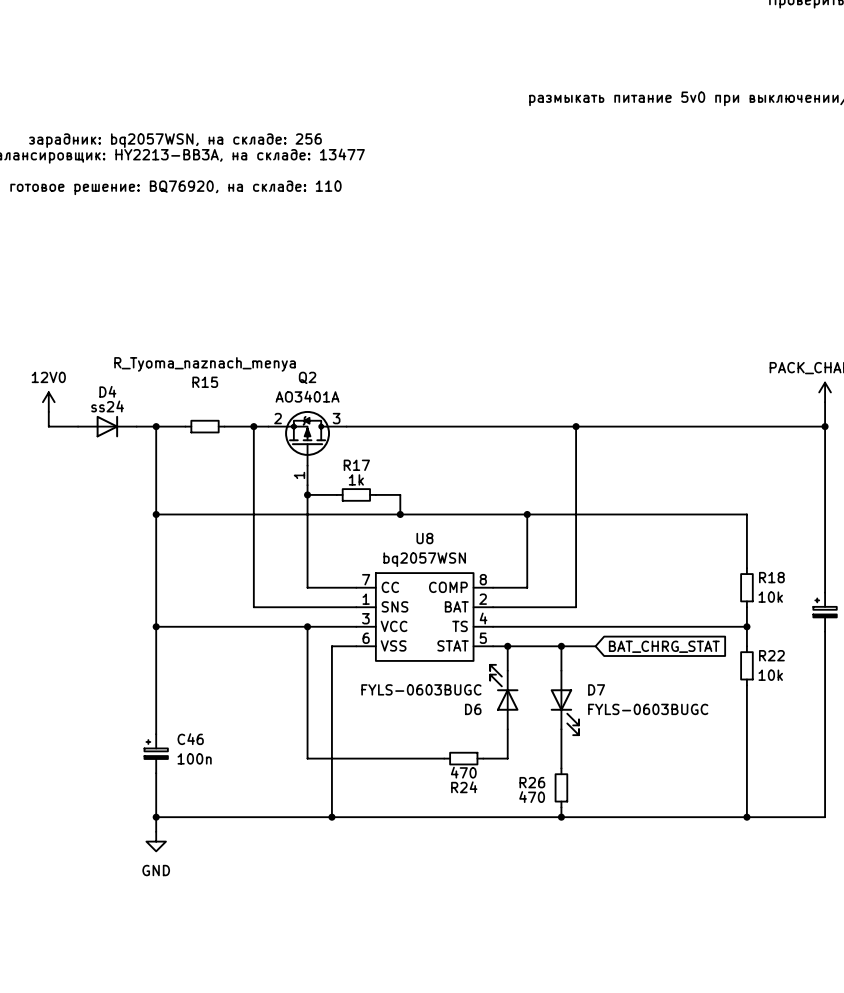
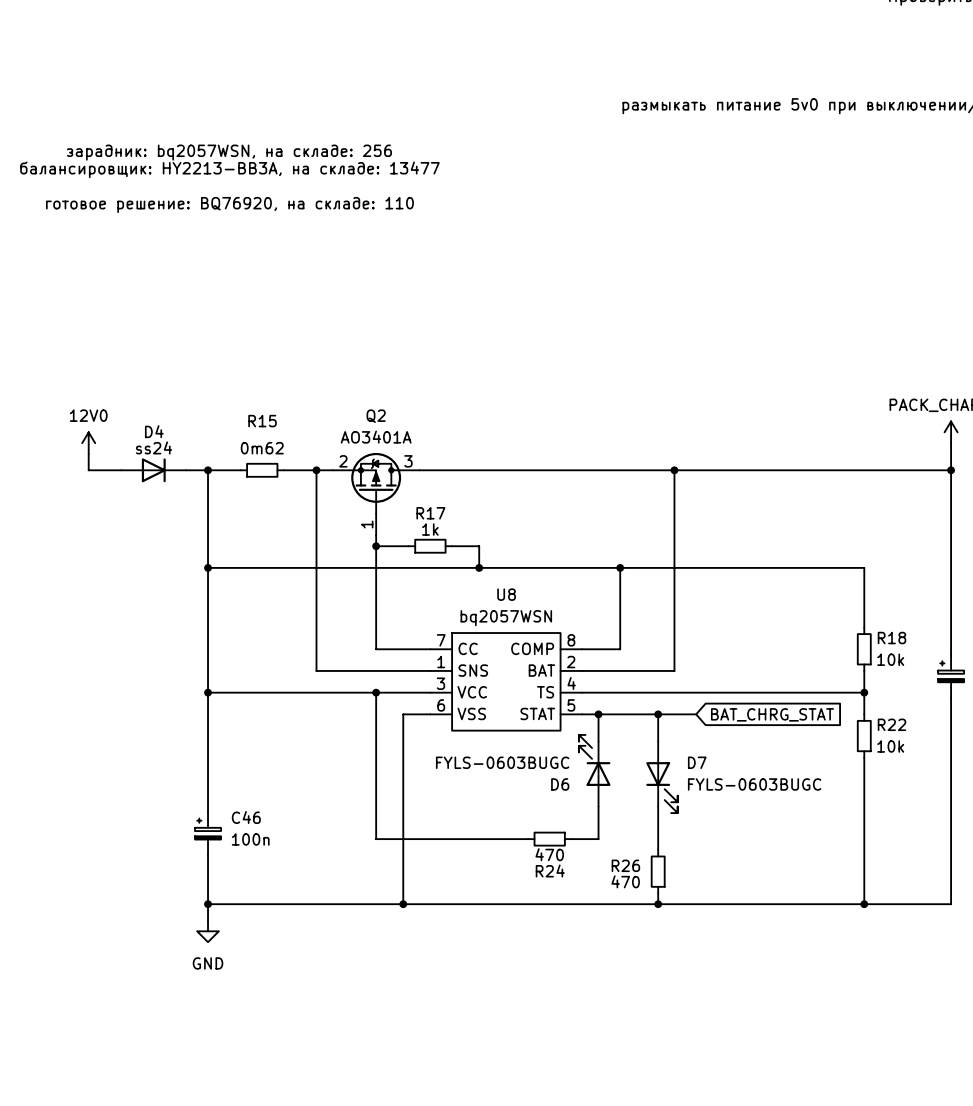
R15 value: R_Tyoma_naznach_menya (205, 364) -> 0m62 (262, 448)

